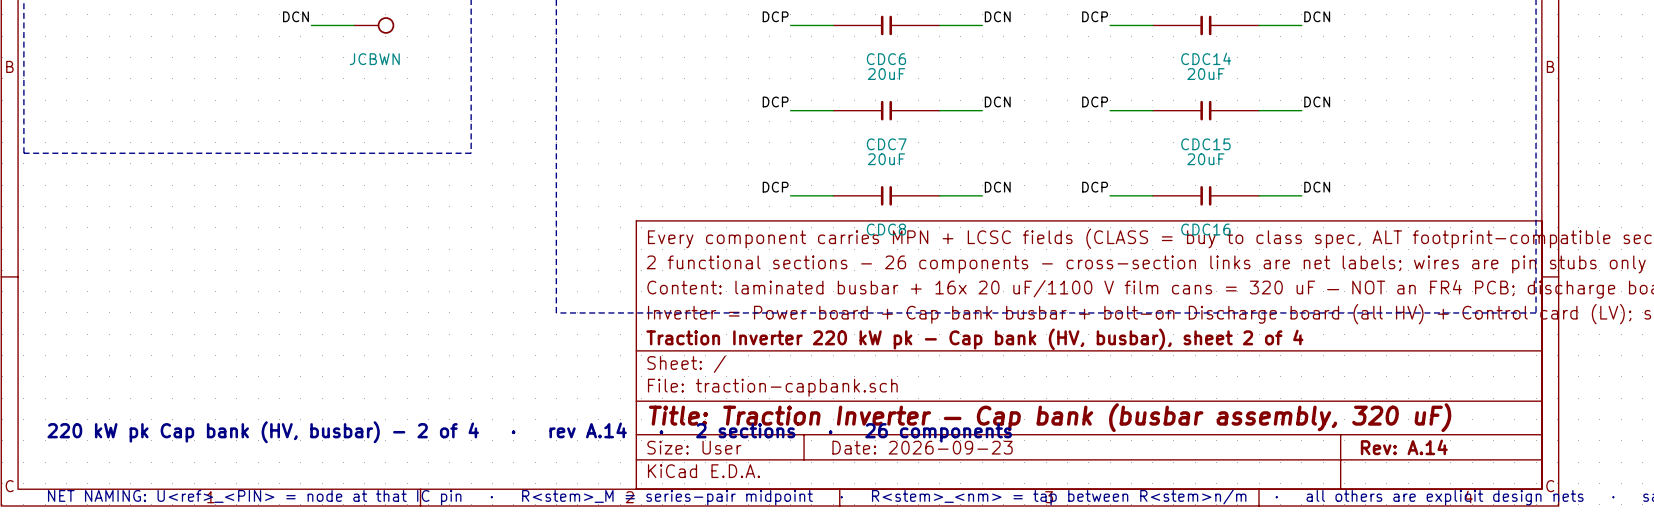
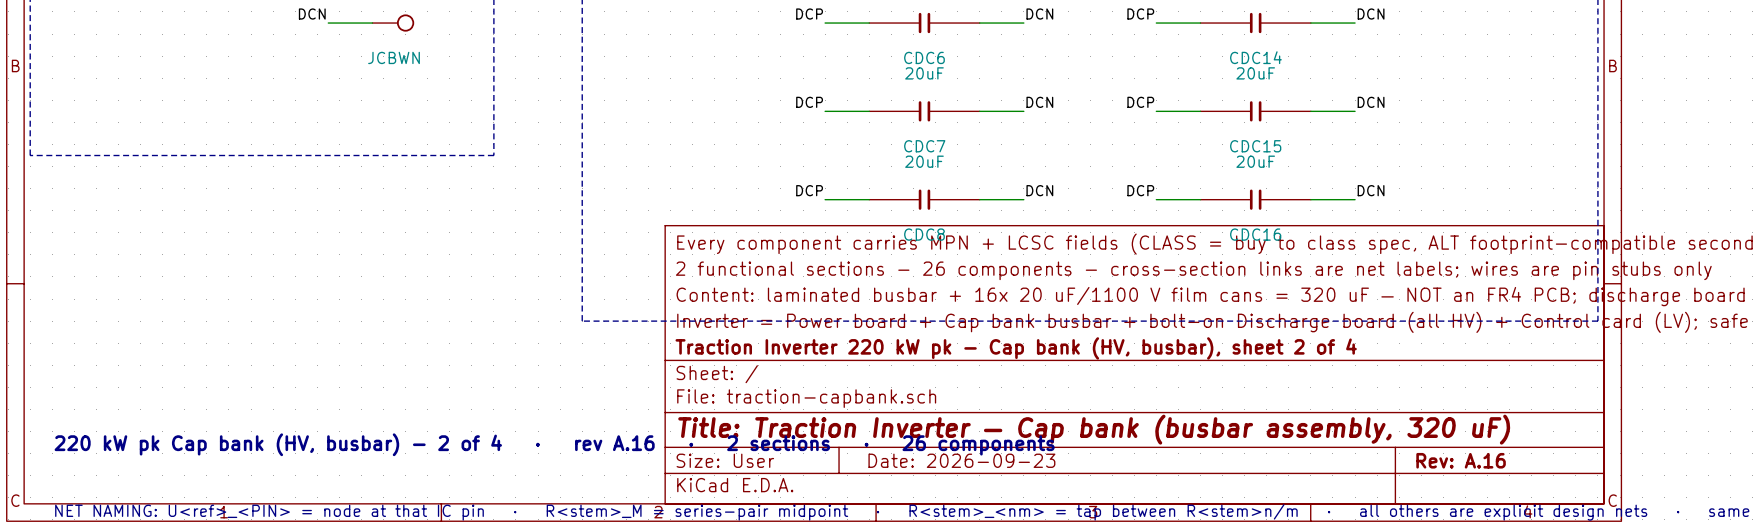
text: 220 kW pk Cap bank (HV, busbar) - 2 of 4 · rev A.14 · 2 sections · 26 components (529, 432) -> 220 kW pk Cap bank (HV, busbar) - 2 of 4 · rev A.16 · 2 sections · 26 components (554, 444)
title block: Rev: A.14 (1404, 447) -> Rev: A.16 (1461, 460)

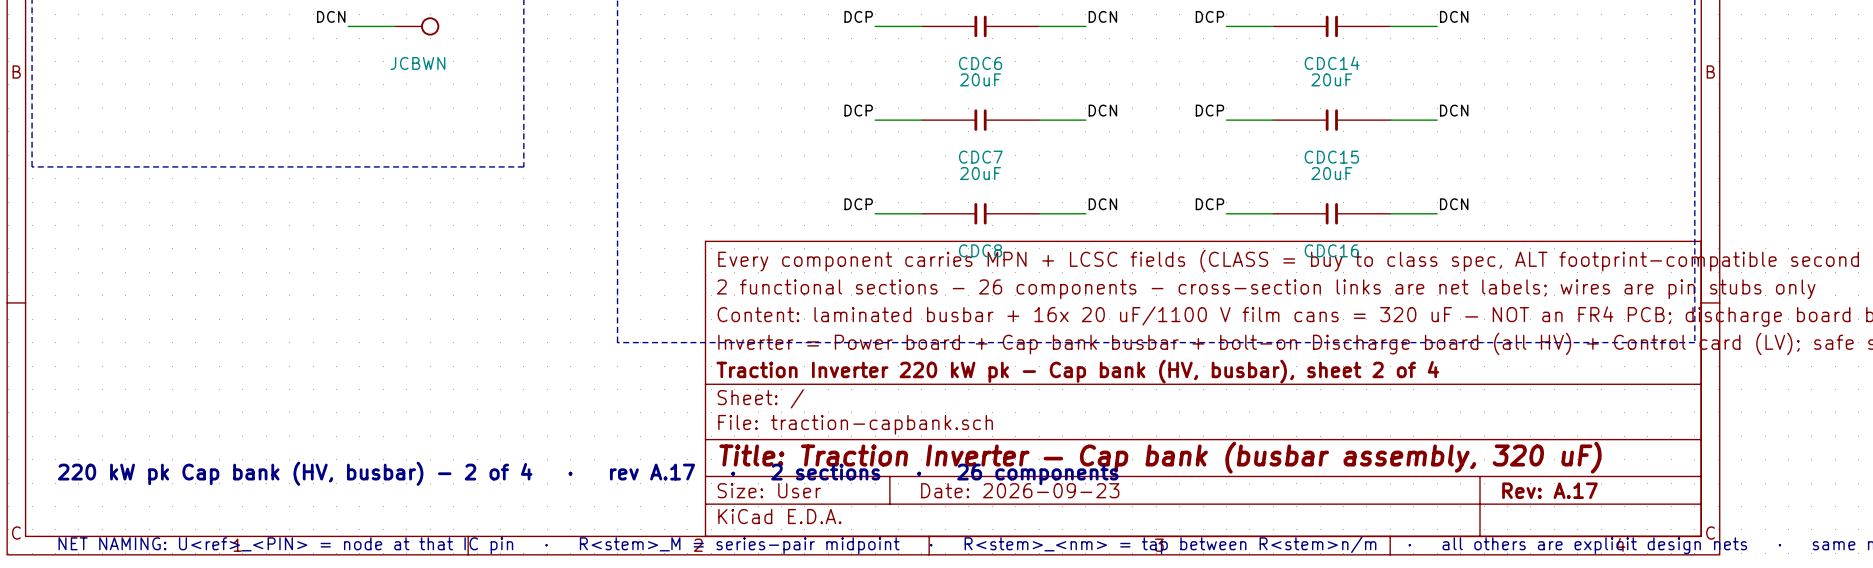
text: 220 kW pk Cap bank (HV, busbar) - 2 of 4 · rev A.16 · 2 sections · 26 components (554, 444) -> 220 kW pk Cap bank (HV, busbar) - 2 of 4 · rev A.17 · 2 sections · 26 components (588, 473)
title block: Rev: A.16 (1461, 460) -> Rev: A.17 (1549, 490)

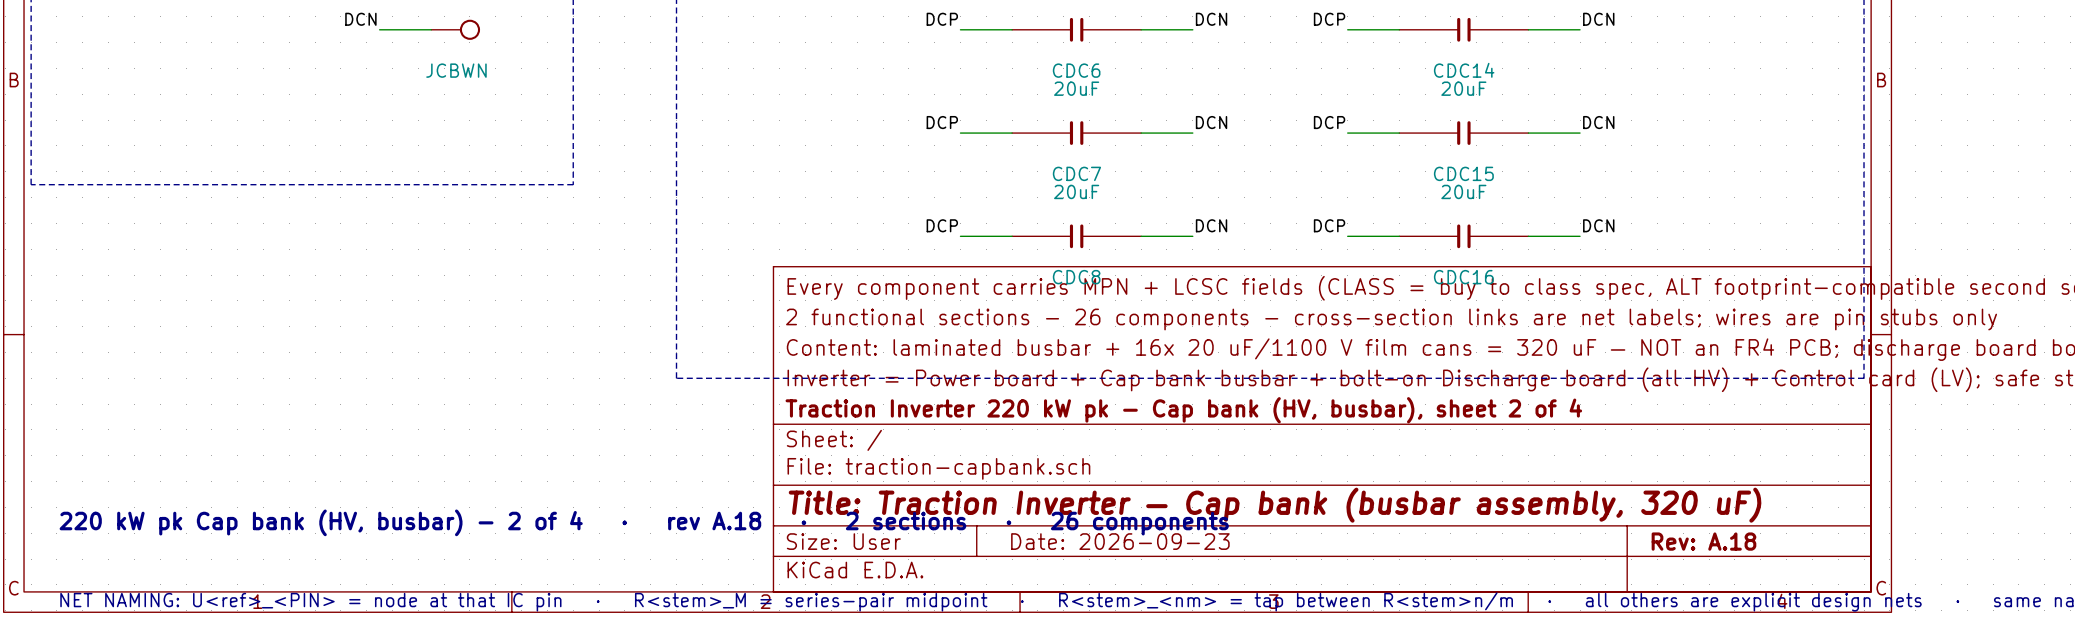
text: 220 kW pk Cap bank (HV, busbar) - 2 of 4 · rev A.17 · 2 sections · 26 components (588, 473) -> 220 kW pk Cap bank (HV, busbar) - 2 of 4 · rev A.18 · 2 sections · 26 components (644, 522)
title block: Rev: A.17 (1549, 490) -> Rev: A.18 (1703, 541)

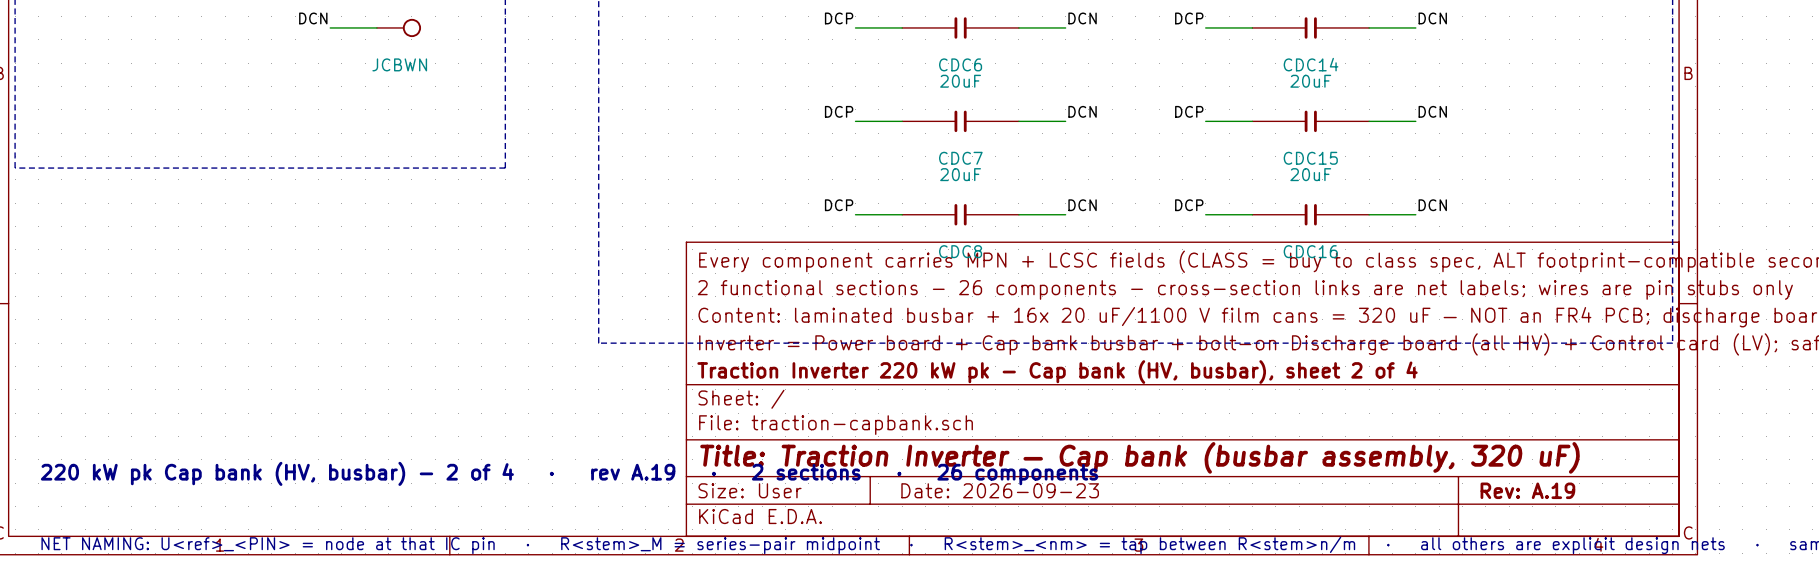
text: 220 kW pk Cap bank (HV, busbar) - 2 of 4 · rev A.18 · 2 sections · 26 components (644, 522) -> 220 kW pk Cap bank (HV, busbar) - 2 of 4 · rev A.19 · 2 sections · 26 components (569, 473)
title block: Rev: A.18 (1703, 541) -> Rev: A.19 (1527, 490)

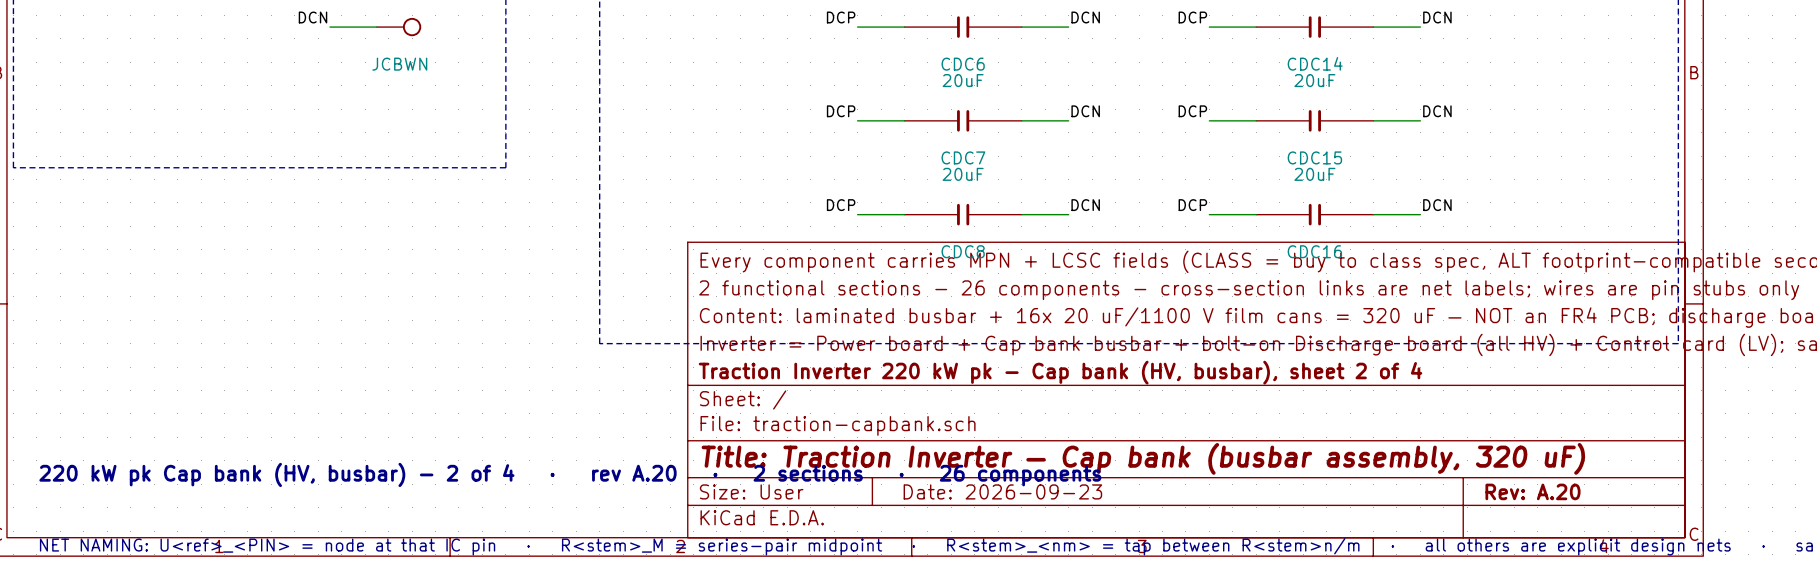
text: 220 kW pk Cap bank (HV, busbar) - 2 of 4 · rev A.19 · 2 sections · 26 components (569, 473) -> 220 kW pk Cap bank (HV, busbar) - 2 of 4 · rev A.20 · 2 sections · 26 components (570, 474)
title block: Rev: A.19 (1527, 490) -> Rev: A.20 (1532, 491)

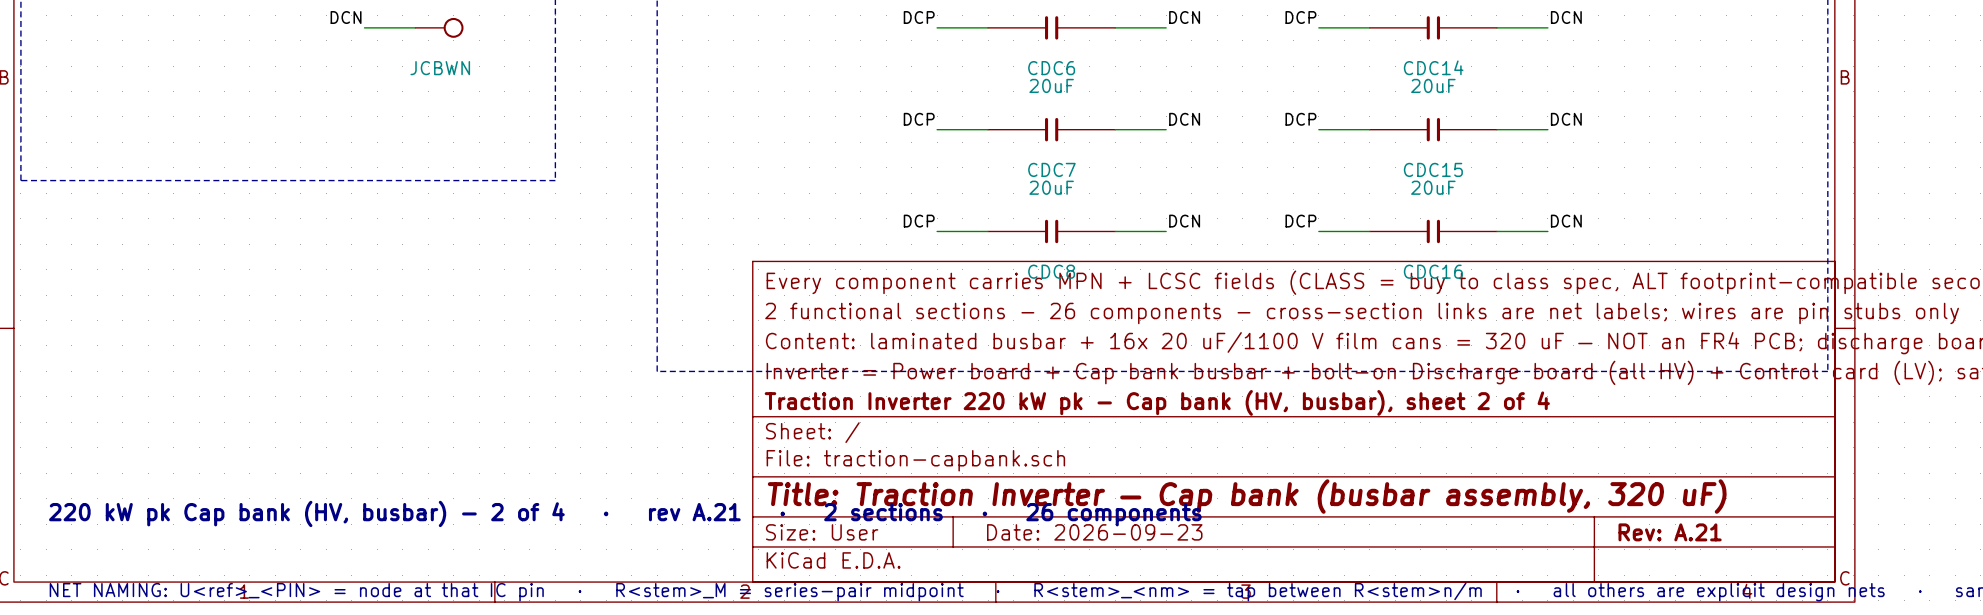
text: 220 kW pk Cap bank (HV, busbar) - 2 of 4 · rev A.20 · 2 sections · 26 components (570, 474) -> 220 kW pk Cap bank (HV, busbar) - 2 of 4 · rev A.21 · 2 sections · 26 components (625, 513)
title block: Rev: A.20 (1532, 491) -> Rev: A.21 (1670, 532)

